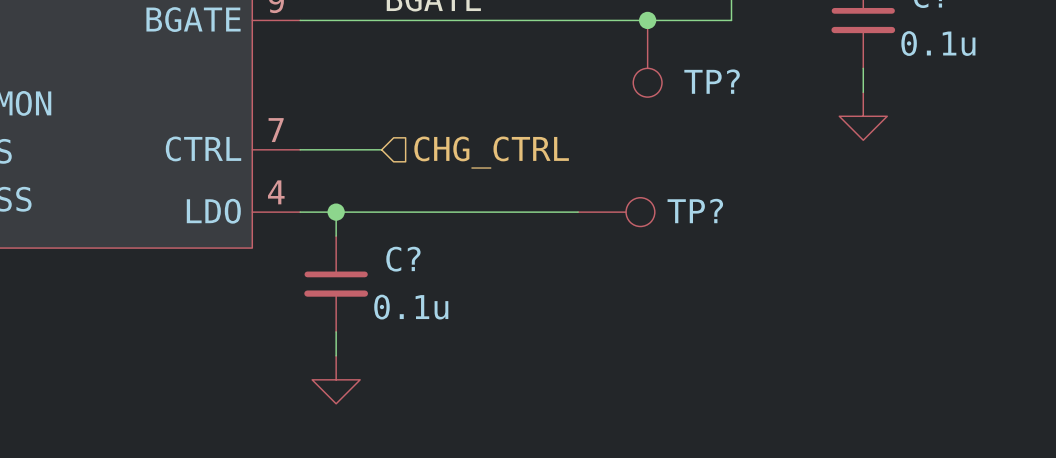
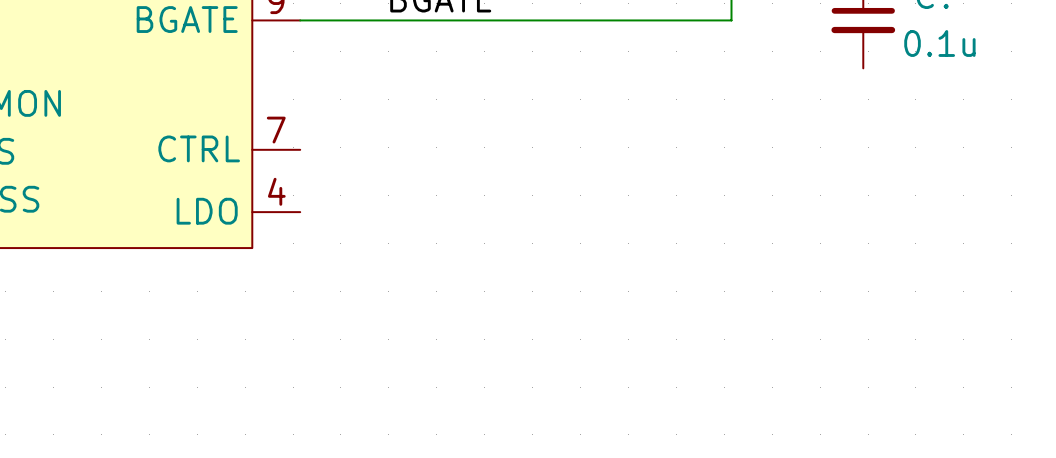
junction: (647, 20) -> none
TP?: (647, 58) -> none
wire: (863, 68) (863, 92) -> none
power symbol: (863, 116) -> none
wire: (300, 149) (381, 149) -> none
hierarchical label: CHG_CTRL (491, 152) -> none
wire: (300, 212) (578, 212) -> none
wire: (336, 212) (336, 236) -> none
junction: (336, 212) -> none
TP?: (616, 212) -> none
C?: 0.1u (336, 284) -> none
wire: (336, 331) (336, 355) -> none
power symbol: (336, 379) -> none

